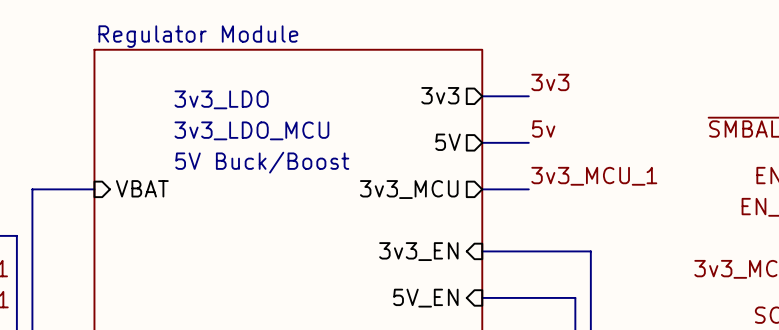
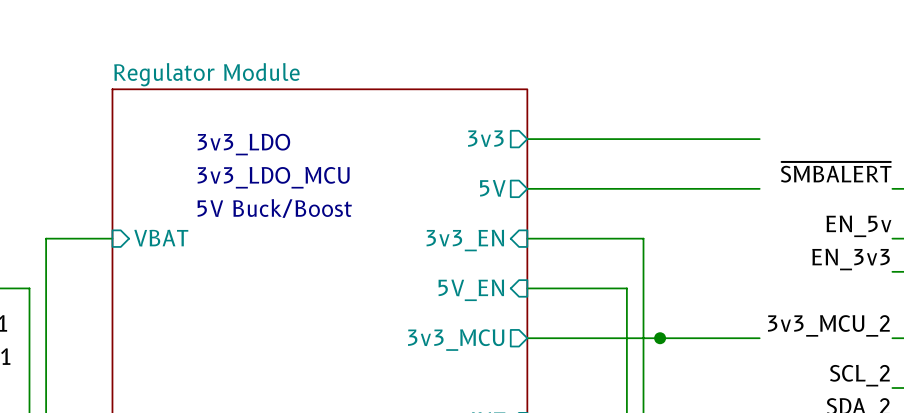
label: 3v3 (550, 82) -> none
wire: none -> (577, 139) (759, 139)
label: 5v (543, 129) -> none
wire: none -> (577, 188) (759, 188)
label: 3v3_MCU_1 (594, 176) -> none
sheet pin shape: output (409, 189) -> input (465, 240)
sheet pin: 3v3_MCU (409, 189) -> 3v3_EN (465, 240)
sheet pin shape: input (418, 251) -> output (456, 340)
sheet pin: 3v3_EN (418, 251) -> 3v3_MCU (456, 340)
wire: (482, 251) (590, 251) -> (577, 238) (643, 238) (643, 305)
wire: none -> (527, 338) (759, 338)
junction: none -> (660, 338)
wire: (482, 297) (575, 297) -> (527, 288) (626, 288) (626, 354)
sheet pin position: 5V_EN (425, 298) -> 5V_EN (471, 290)

